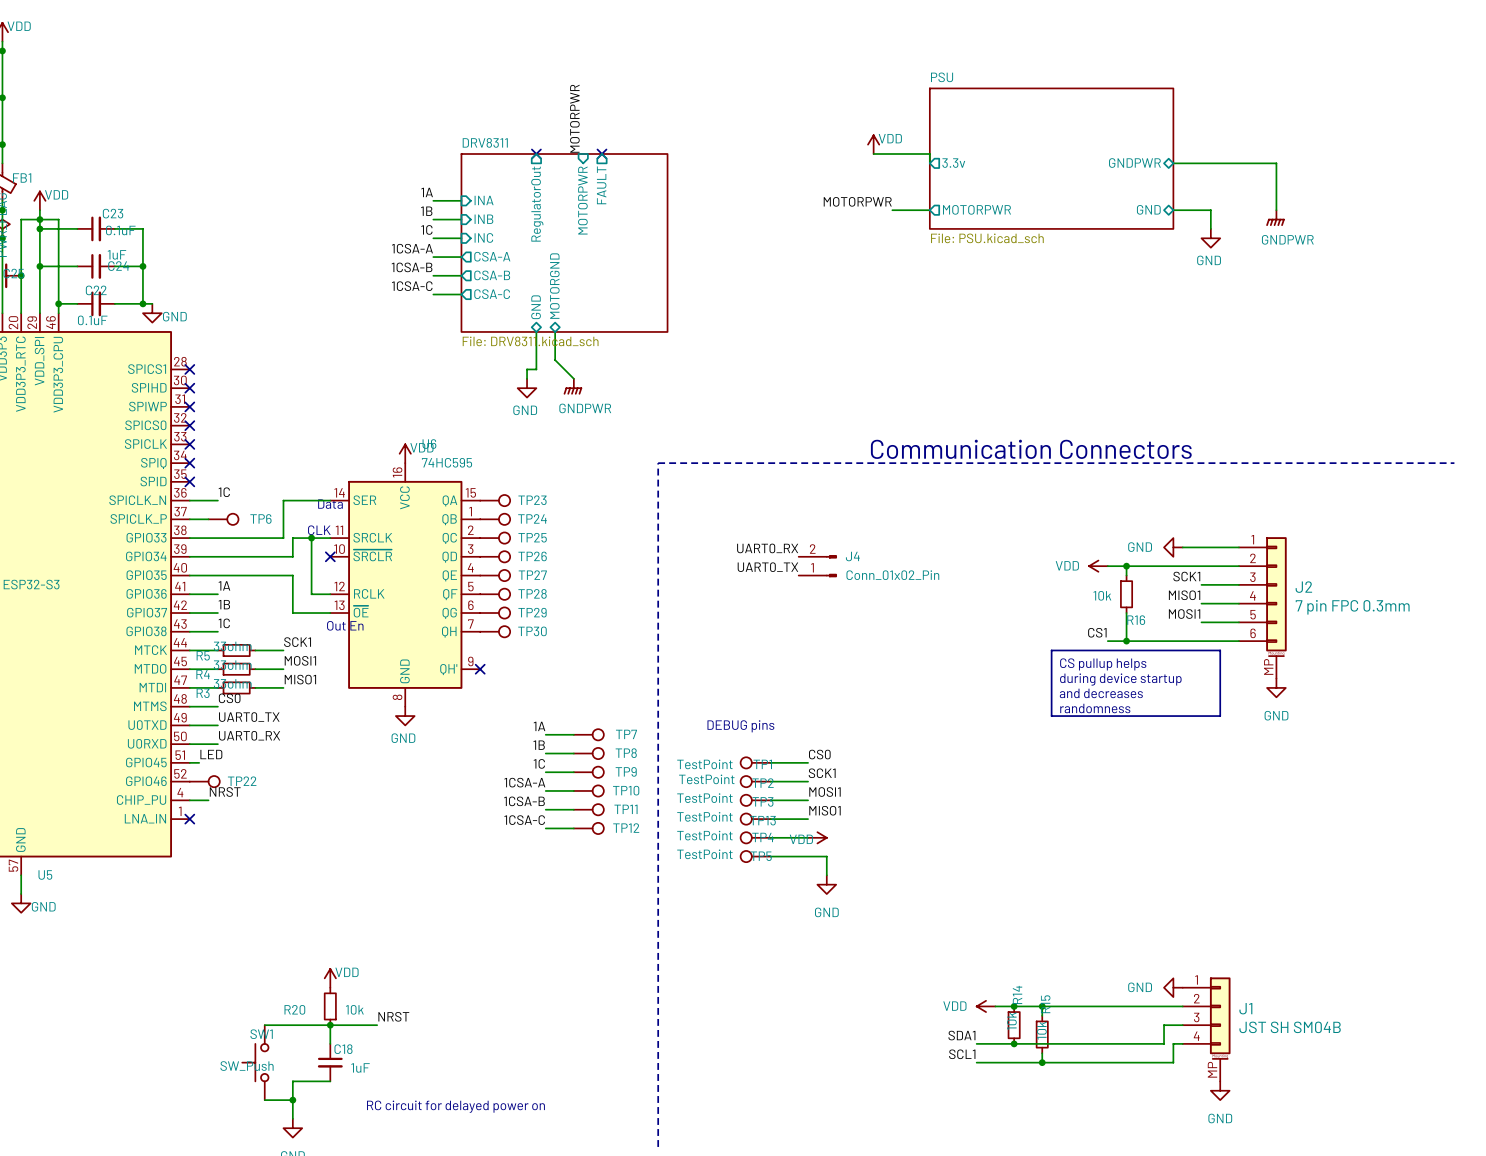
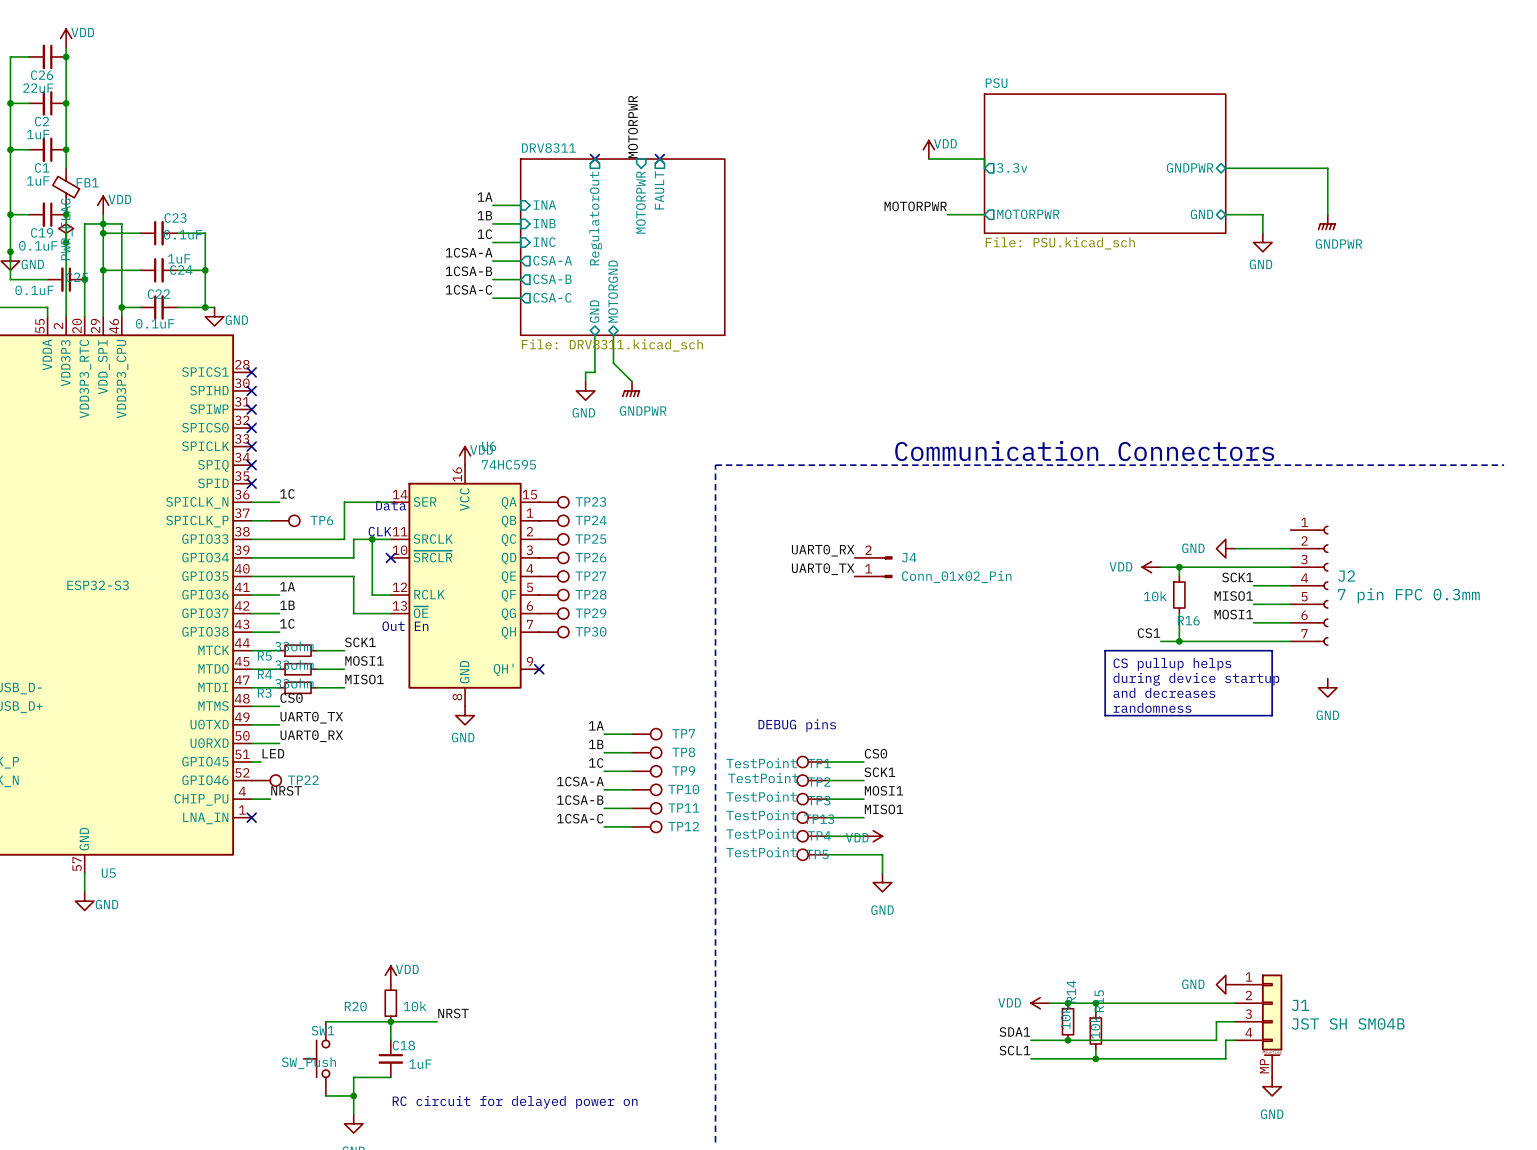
J2 symbol: [1238, 537, 1287, 679] -> [1290, 525, 1329, 646]

